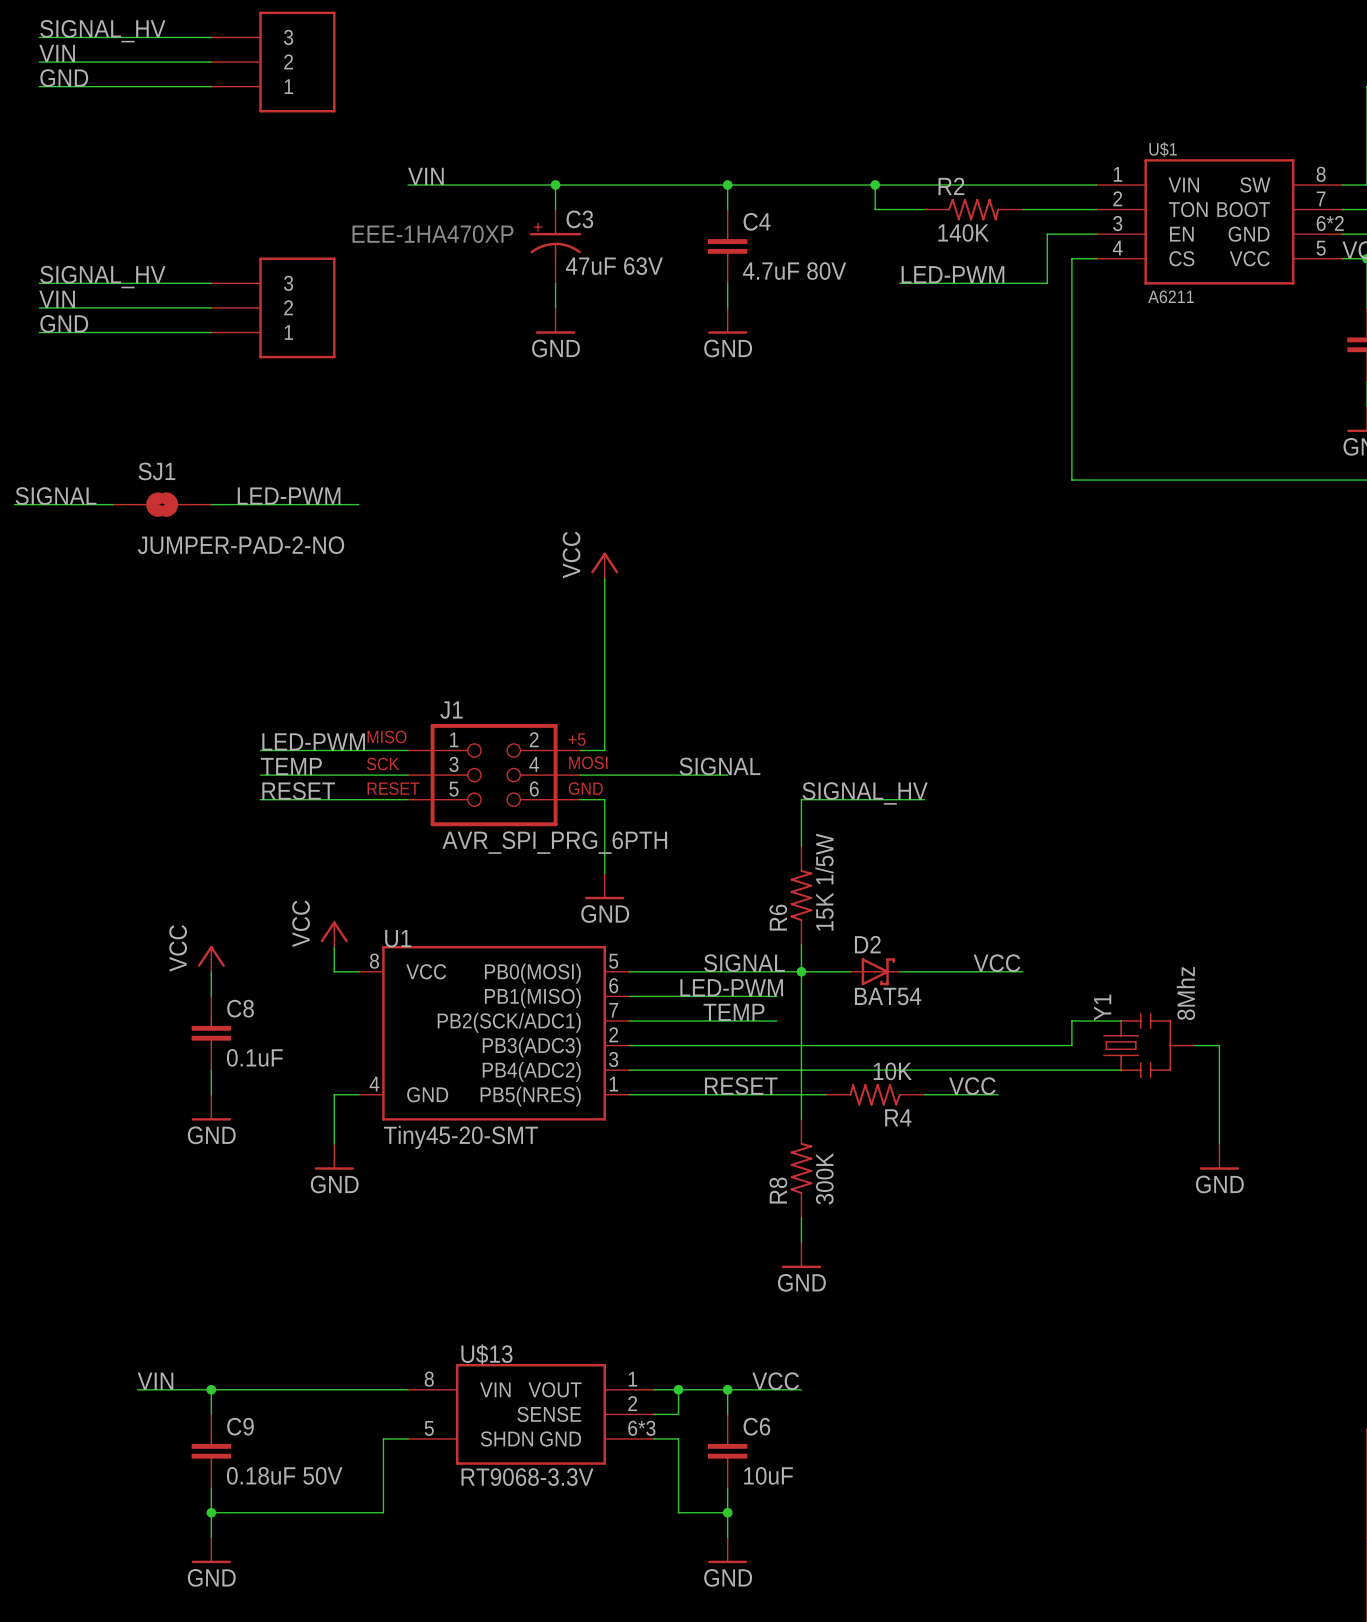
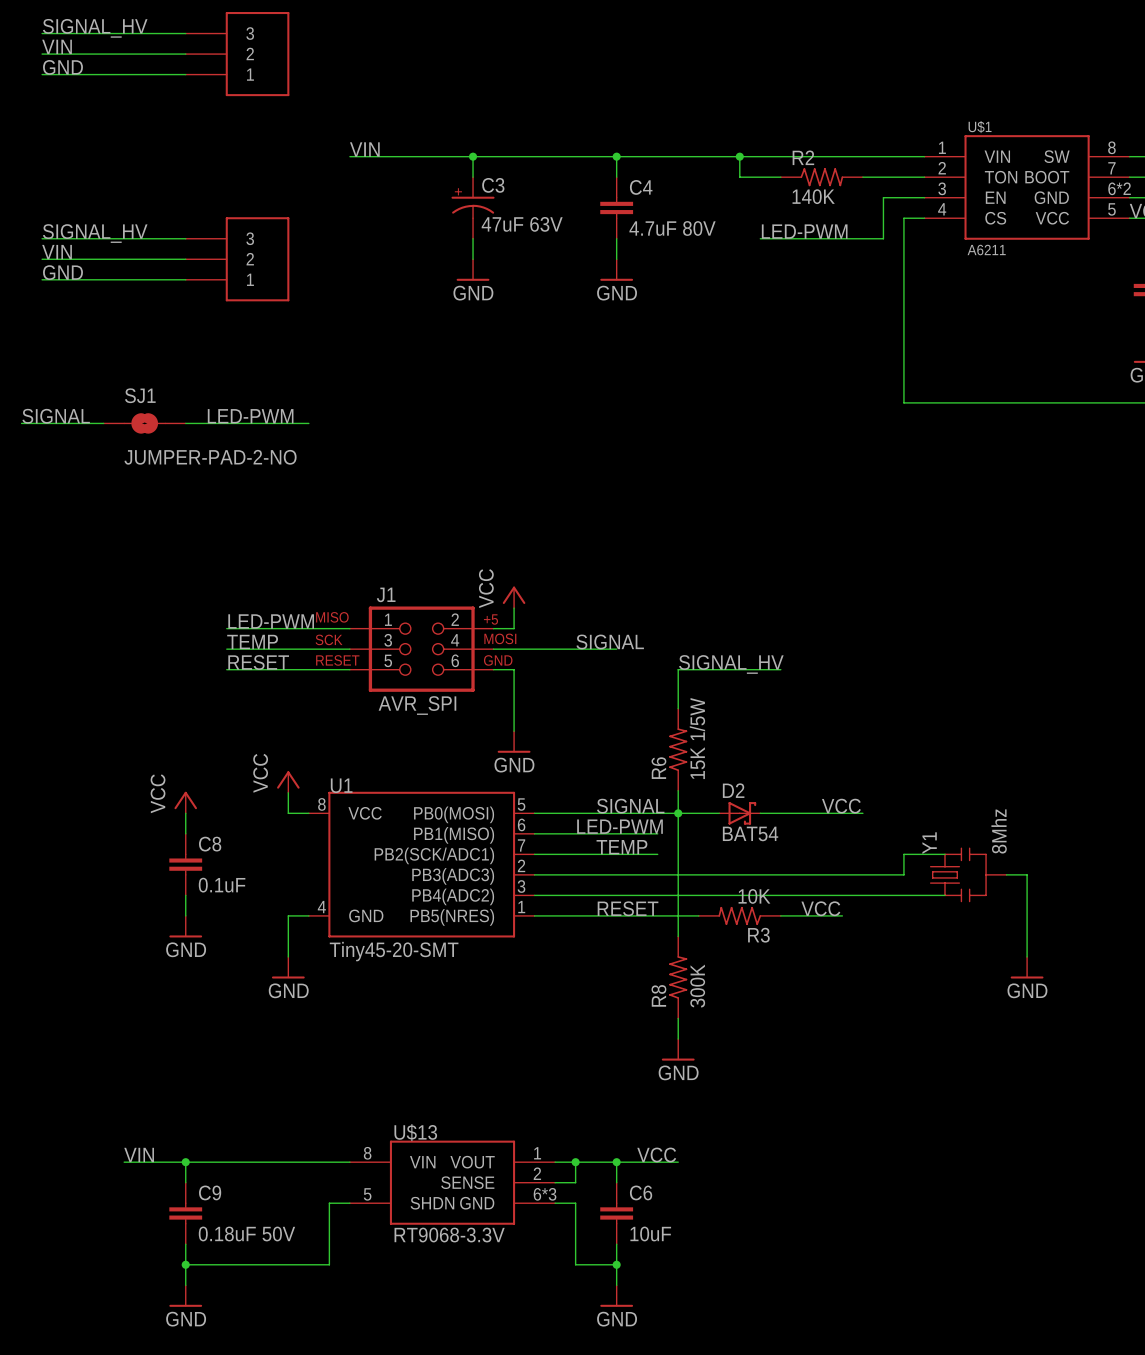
text: EEE-1HA470XP (432, 234) -> none
power symbol position: VCC (604, 565) -> VCC (514, 597)
wire: (604, 578) (604, 725) -> none
J1 value: AVR_SPI_PRG_6PTH (554, 842) -> AVR_SPI (417, 705)
R4 name: R4 (898, 1117) -> R3 (758, 935)

